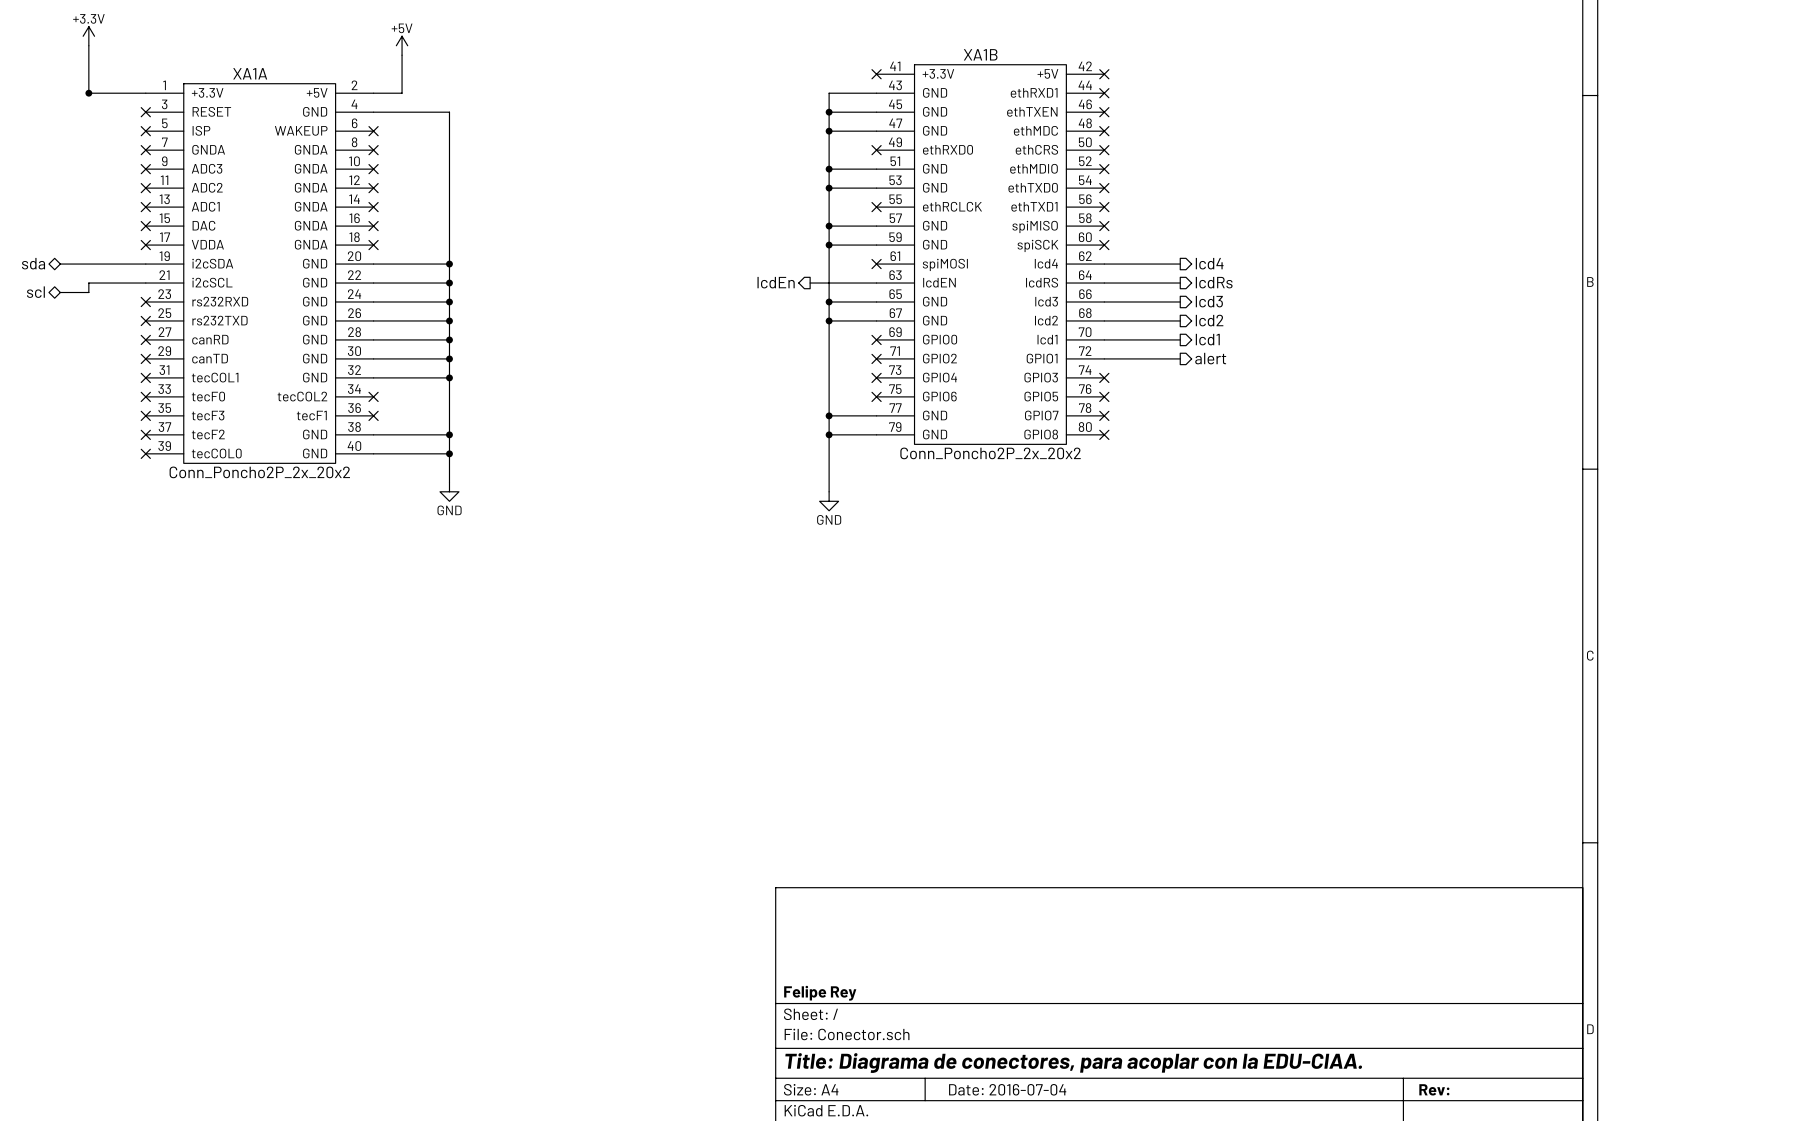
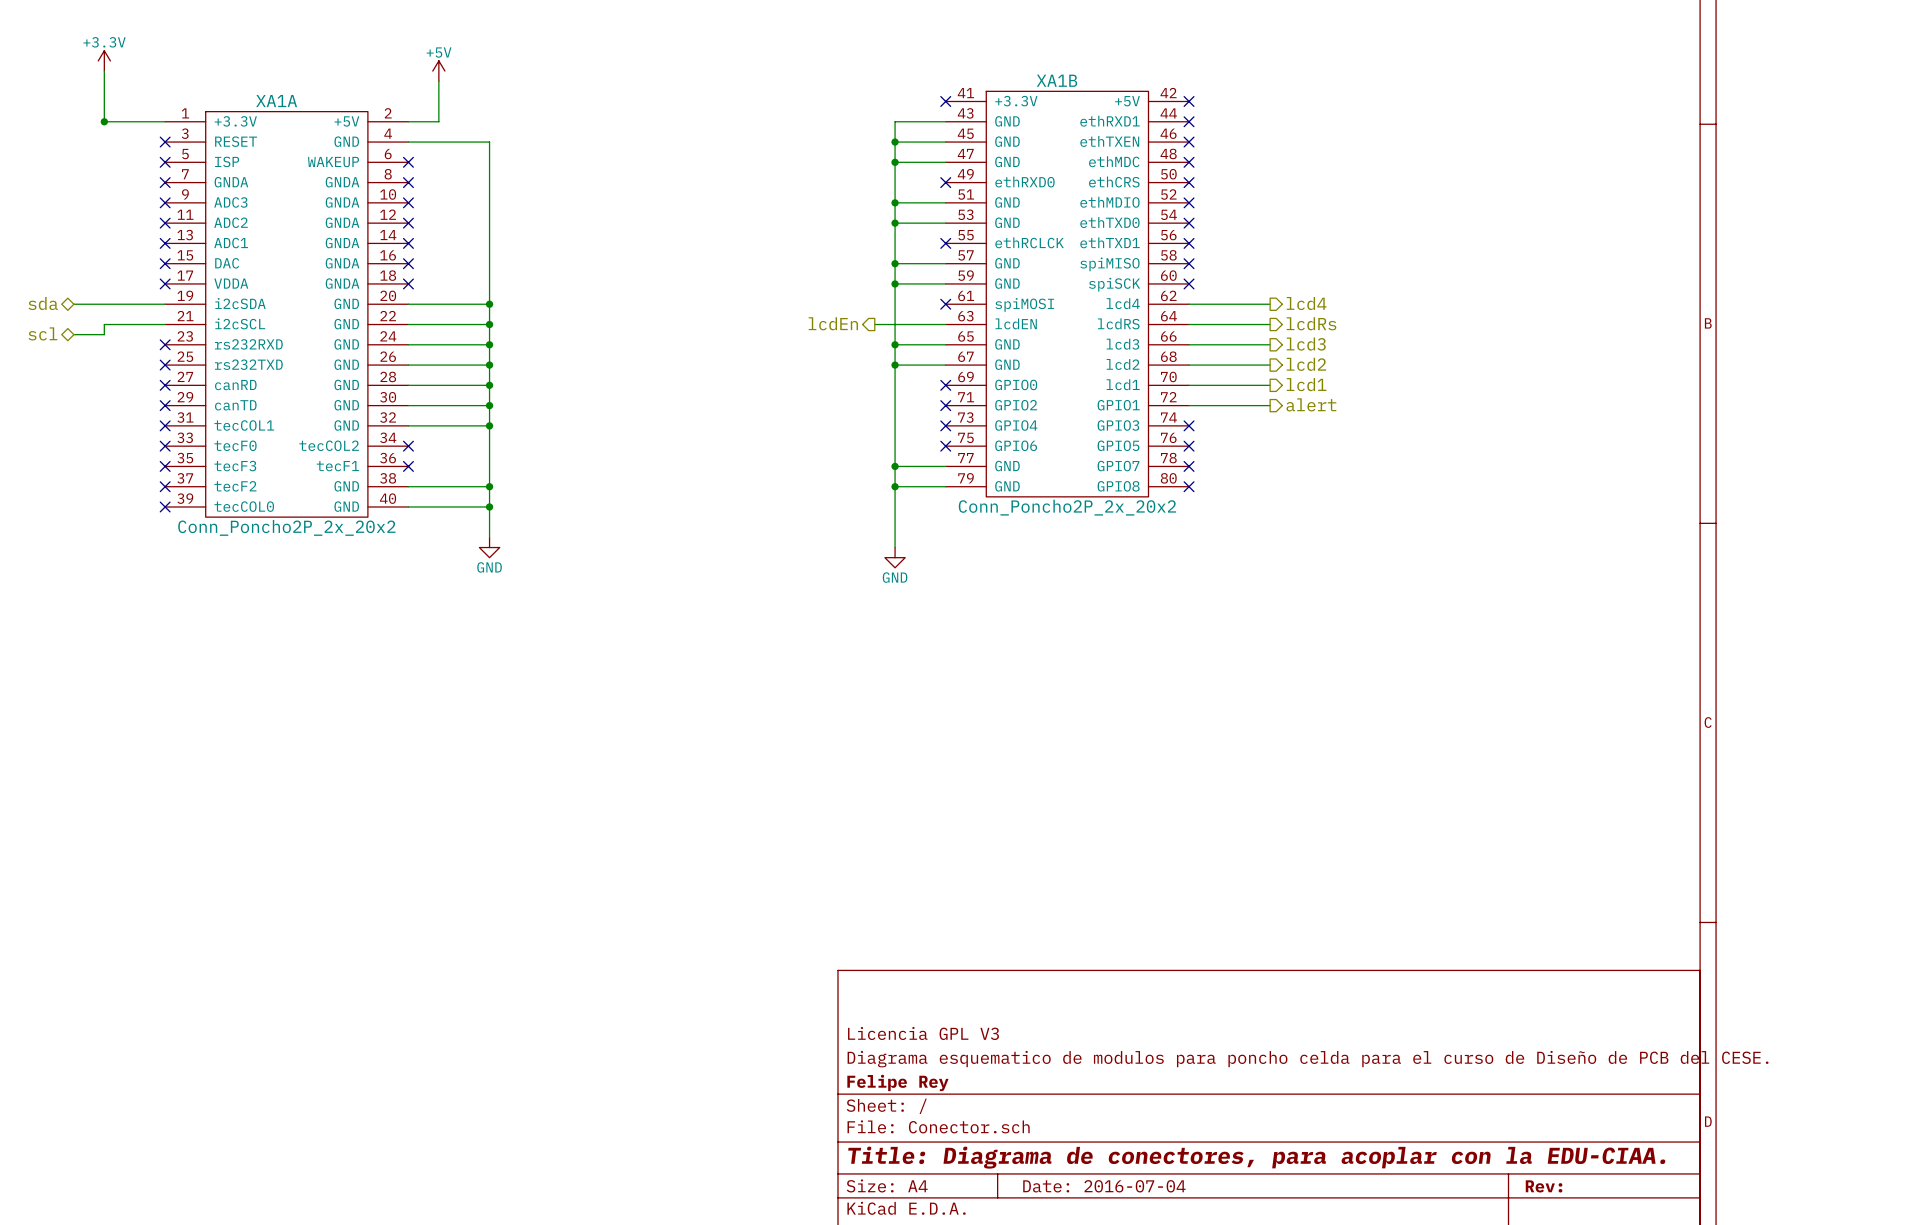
title block: none -> Licencia GPL V3 (923, 1033)
title block: none -> Diagrama esquematico de modulos para poncho celda para el curso de Diseño de PCB del CESE. (1308, 1059)

